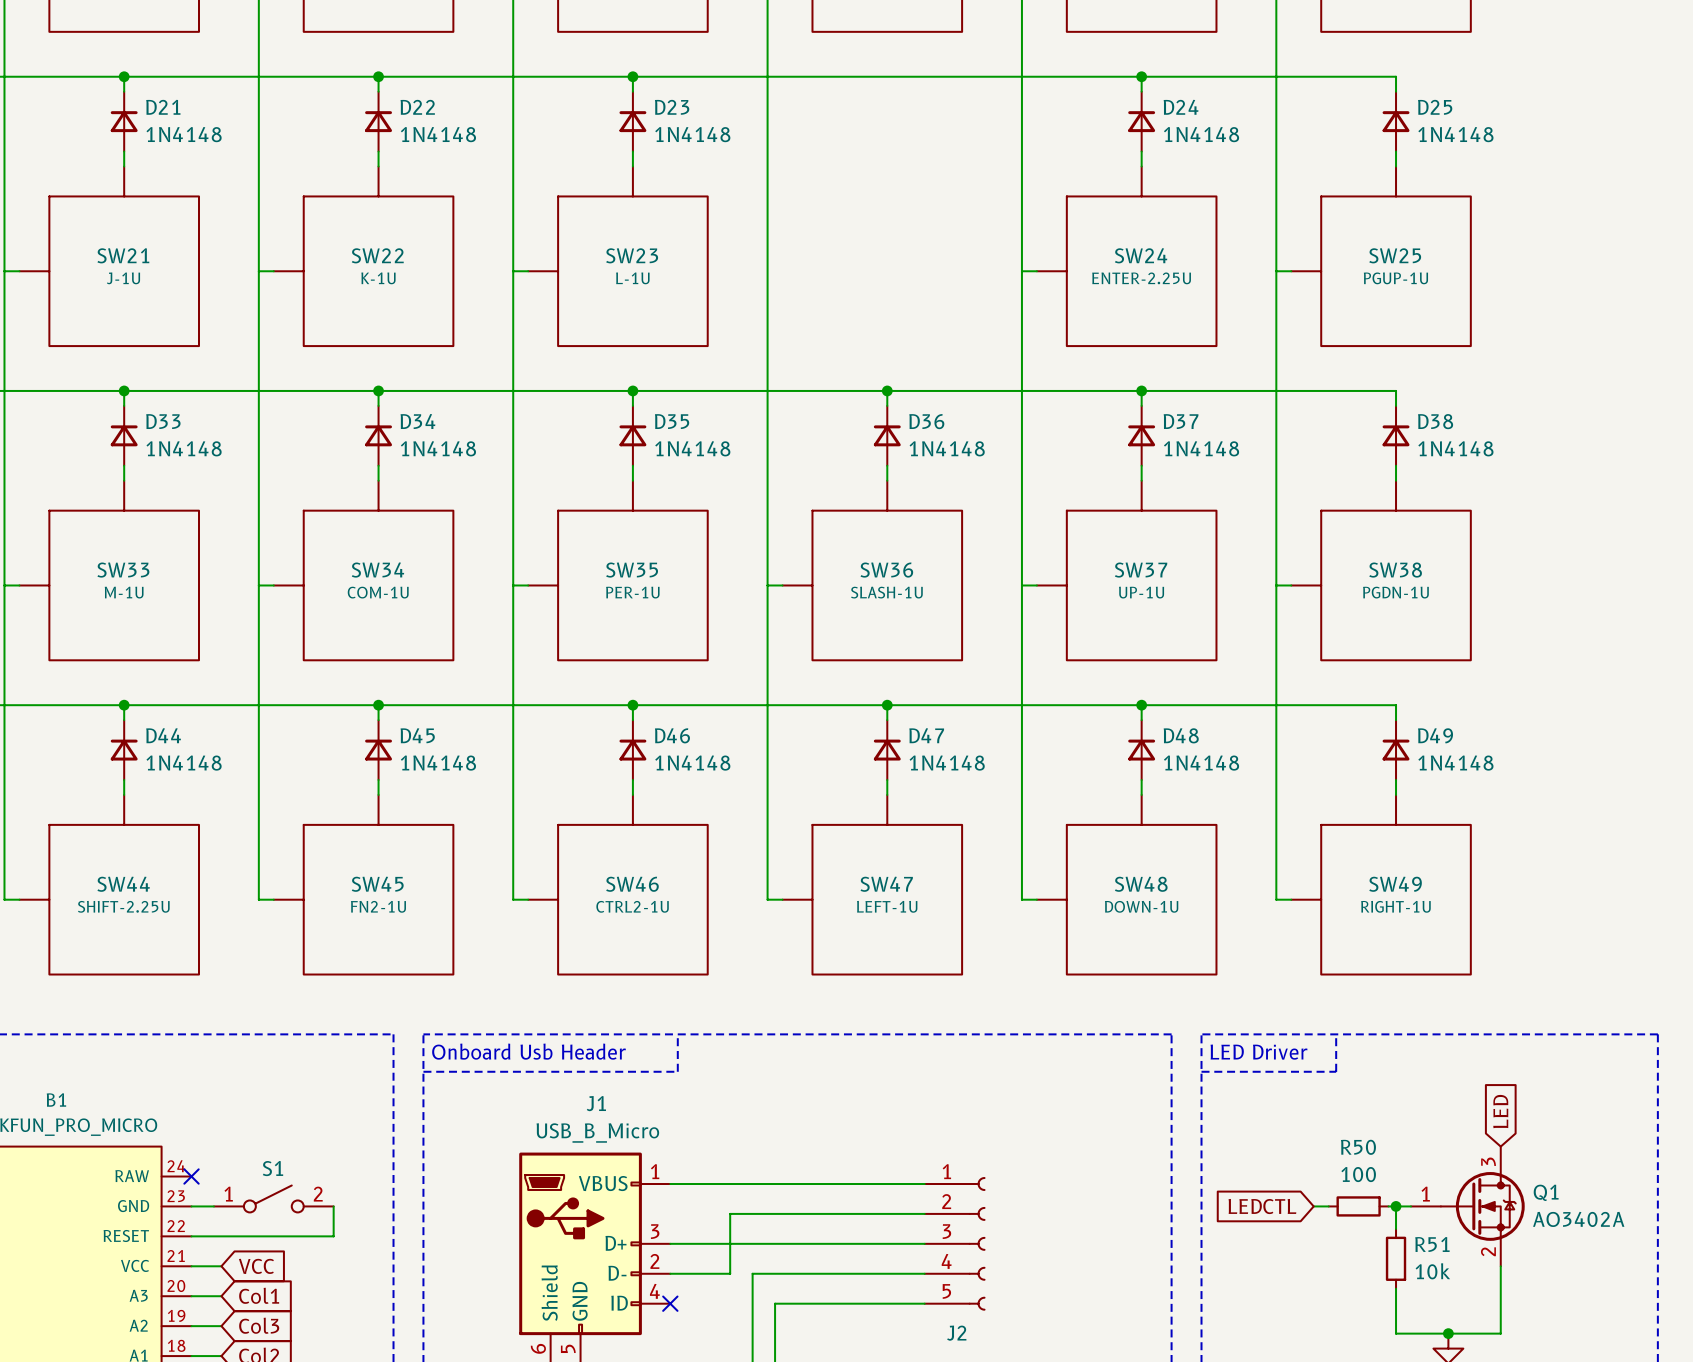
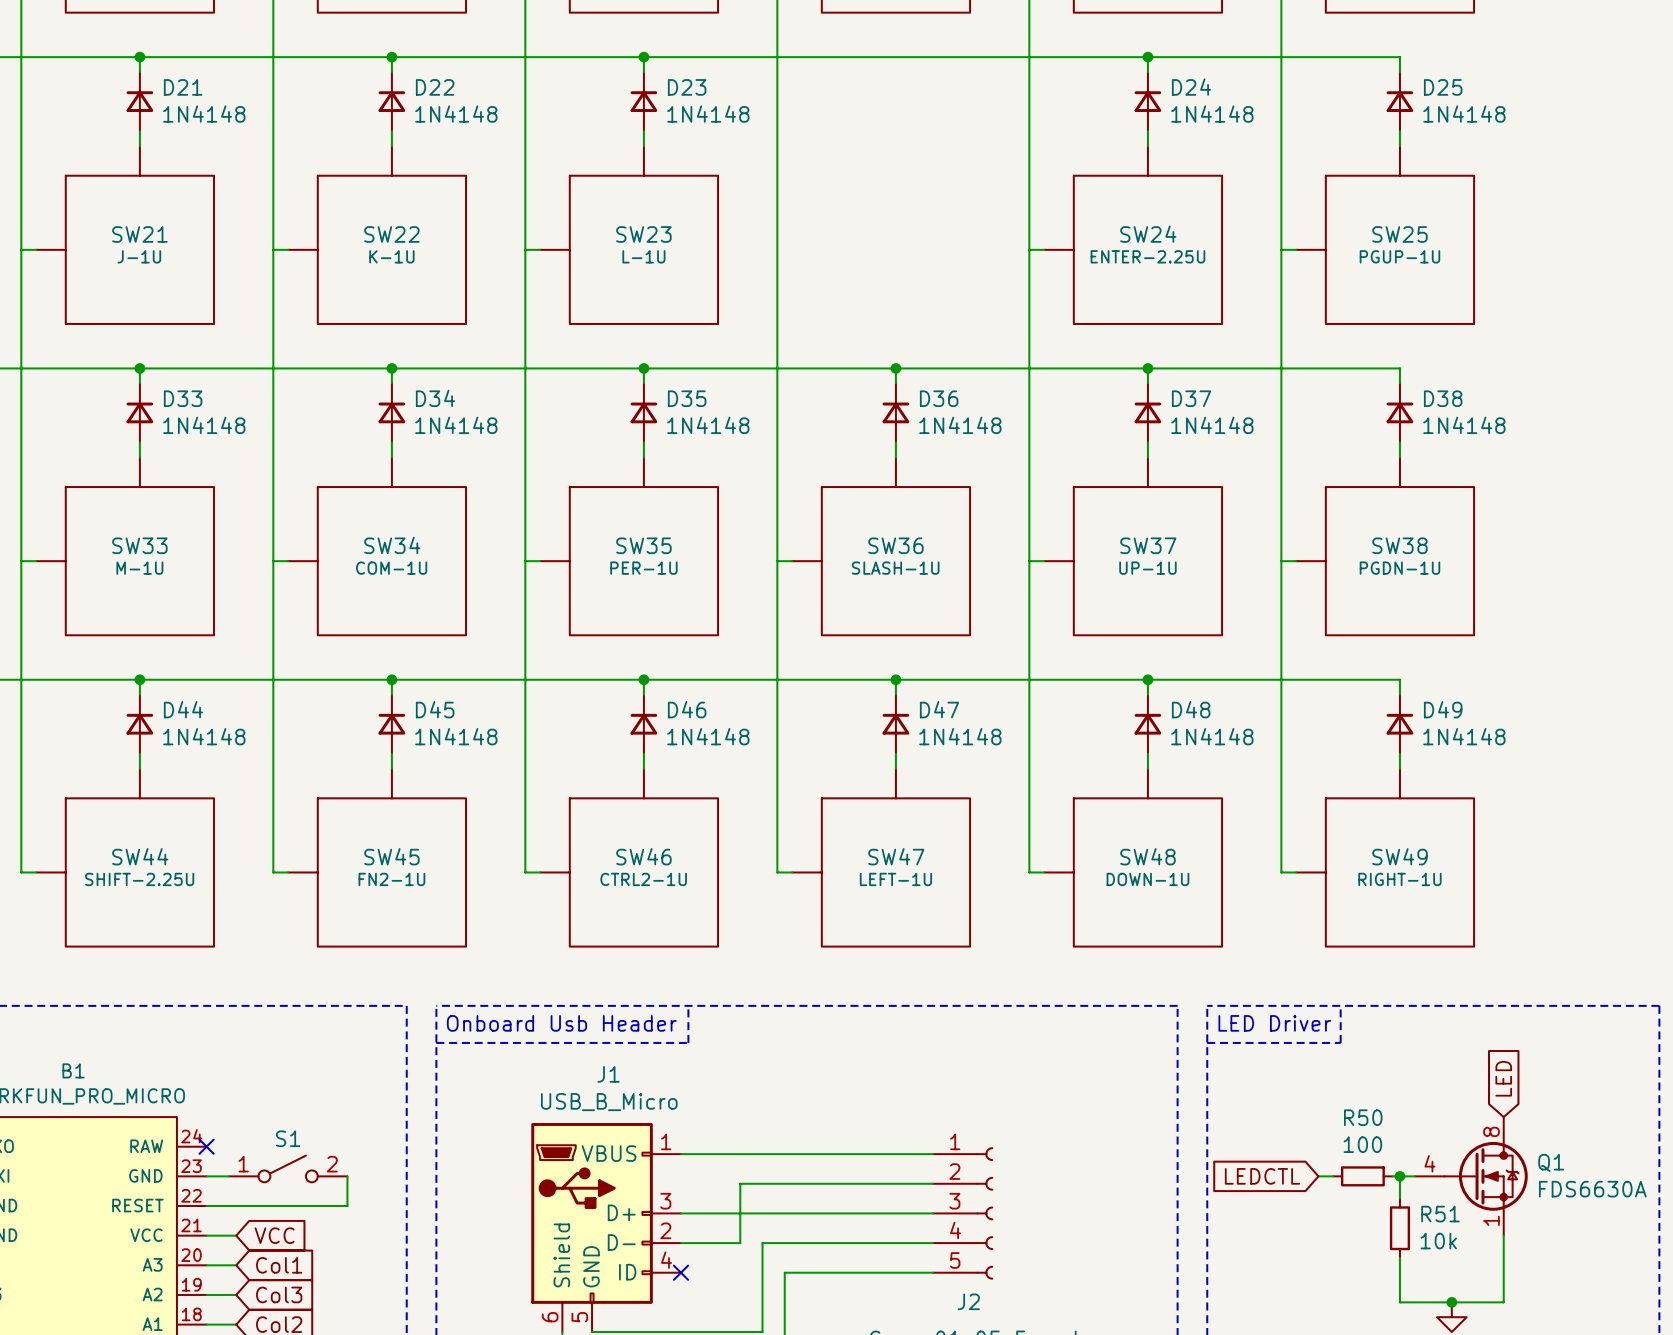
Q1 symbol: [1410, 1146, 1525, 1267] -> [1414, 1117, 1528, 1236]
Q1 value: AO3402A (1578, 1219) -> FDS6630A (1592, 1189)

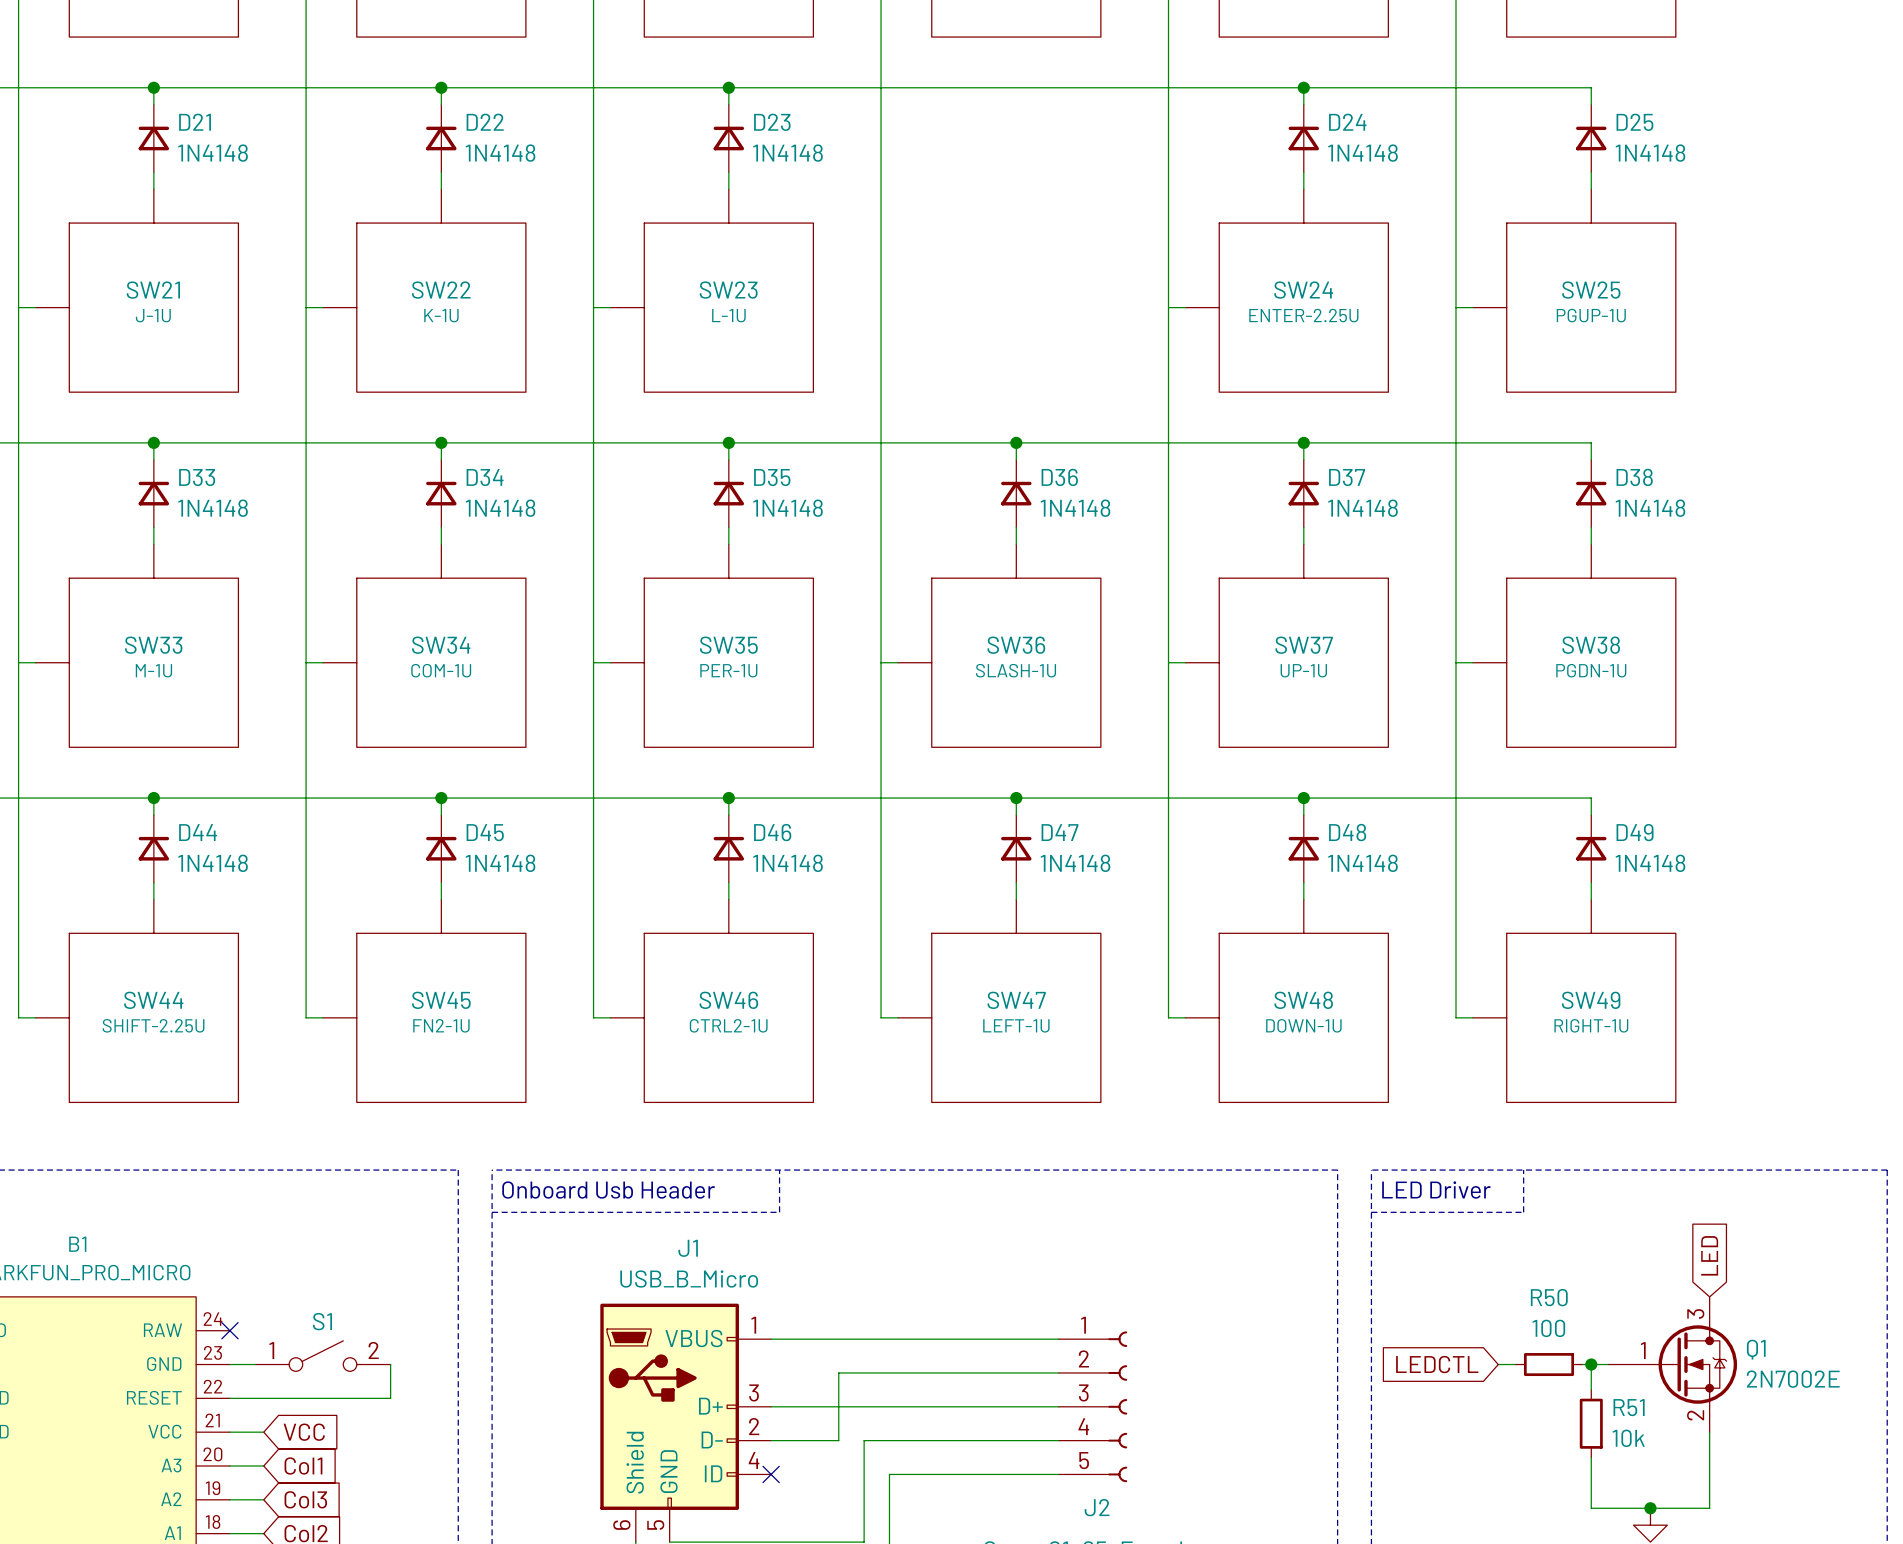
Q1 symbol: [1414, 1117, 1528, 1236] -> [1608, 1296, 1738, 1433]
Q1 value: FDS6630A (1592, 1189) -> 2N7002E (1793, 1379)

